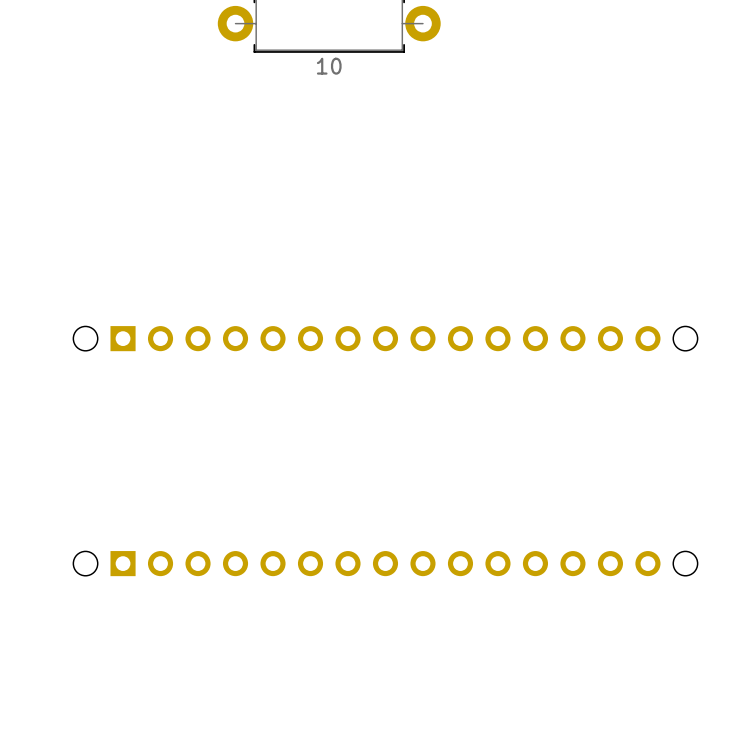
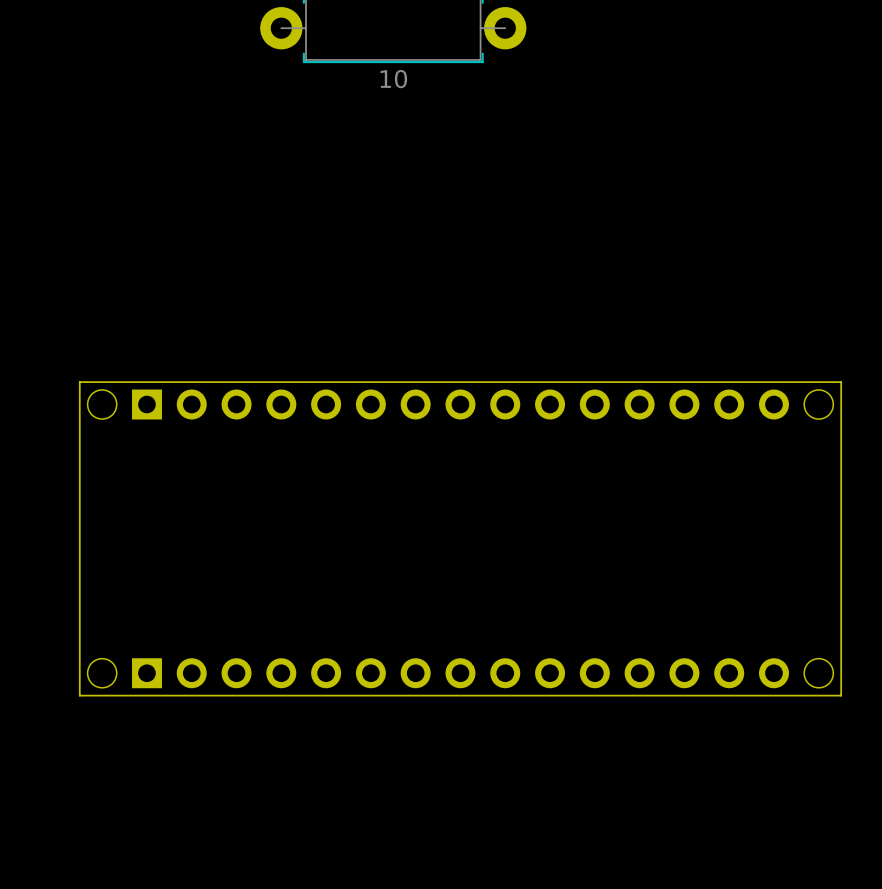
board edge: none -> (79, 382) (841, 382) (841, 695) (79, 695) (79, 382)

